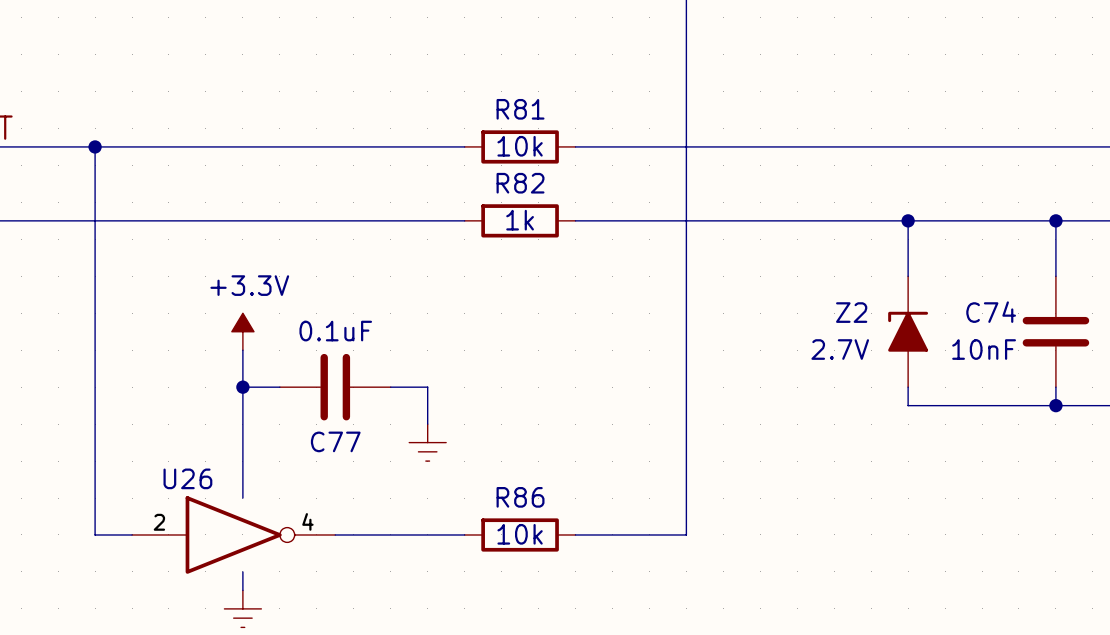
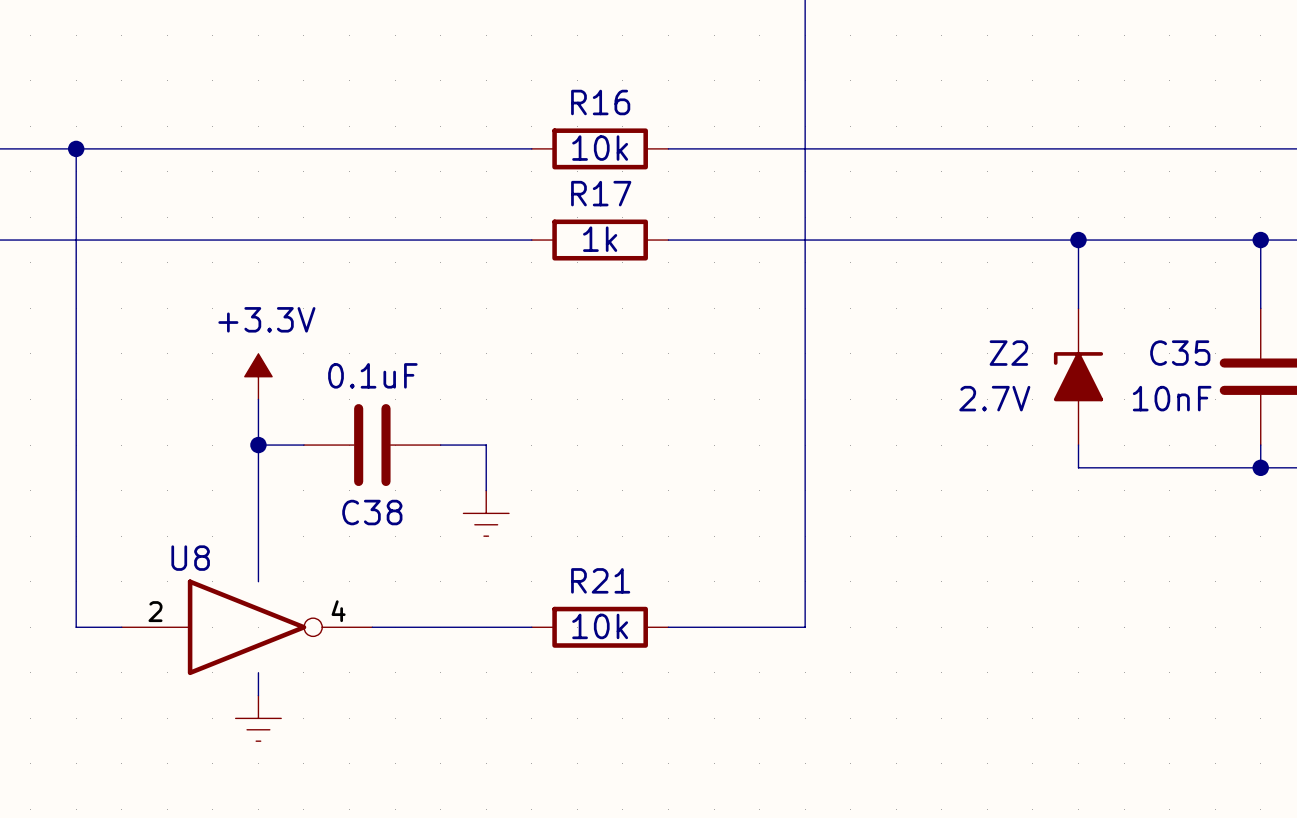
R81 name: R81 (520, 109) -> R16 (600, 102)
R82 name: R82 (520, 183) -> R17 (601, 193)
C74 name: C74 (991, 312) -> C35 (1180, 353)
C77 name: C77 (335, 441) -> C38 (372, 512)
U26 name: U26 (187, 478) -> U8 (190, 558)
R86 name: R86 (520, 497) -> R21 (600, 580)

